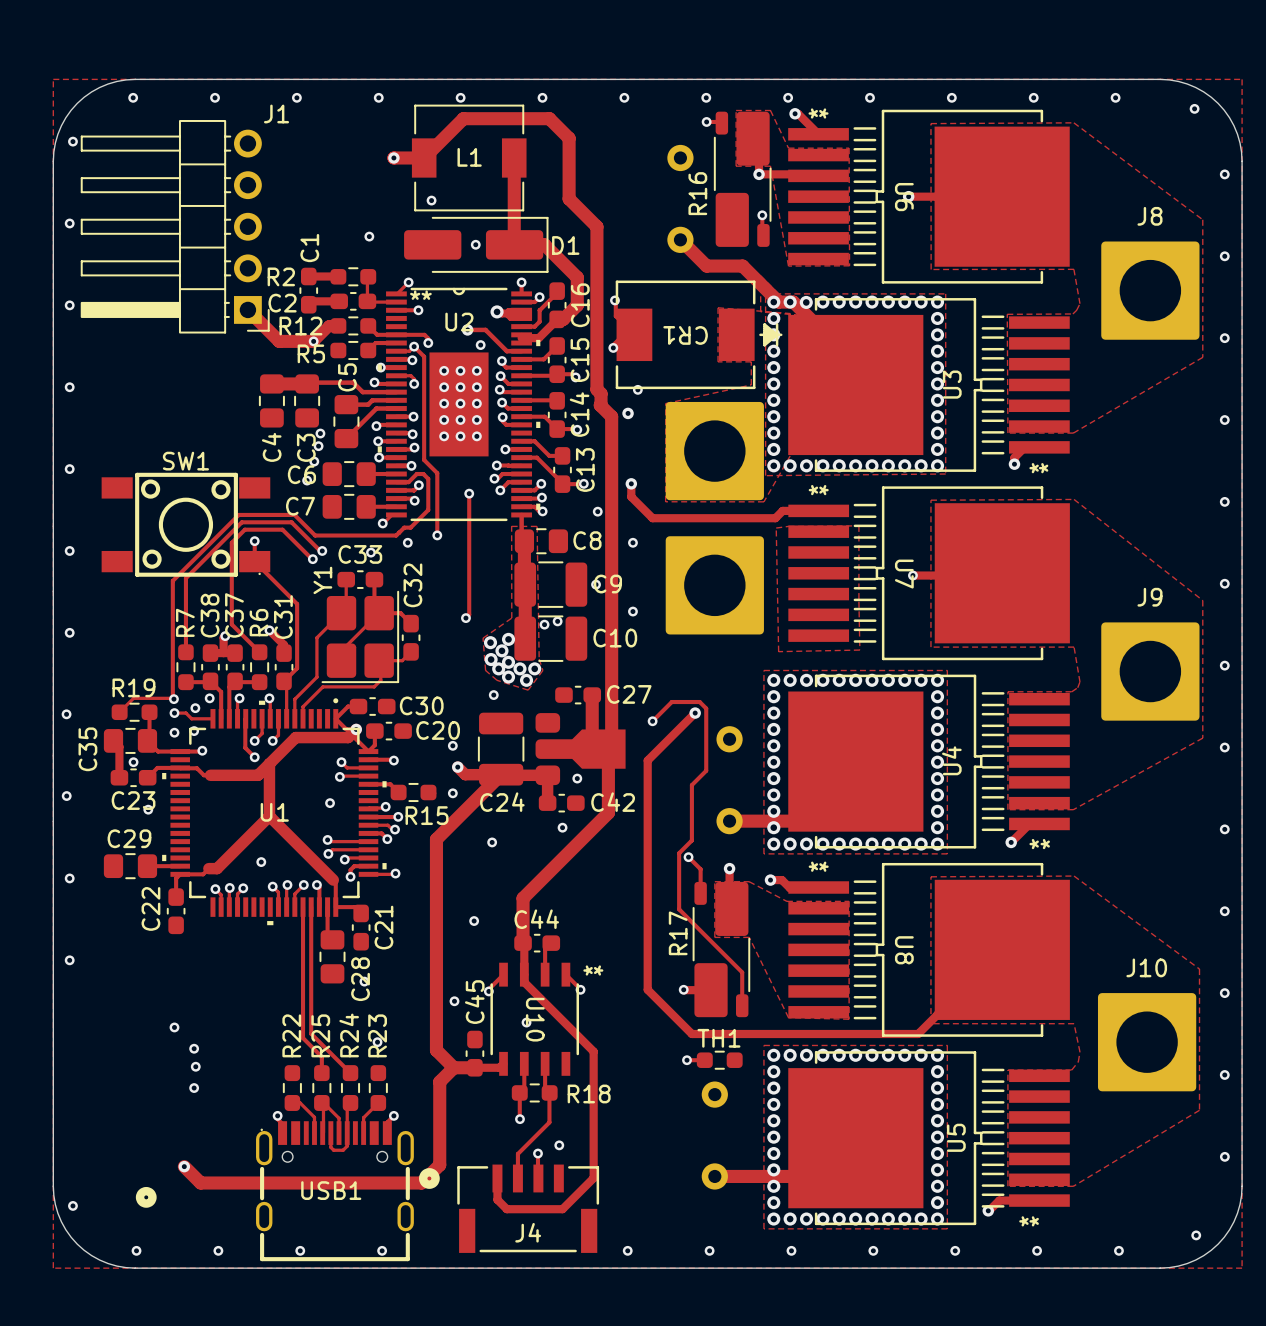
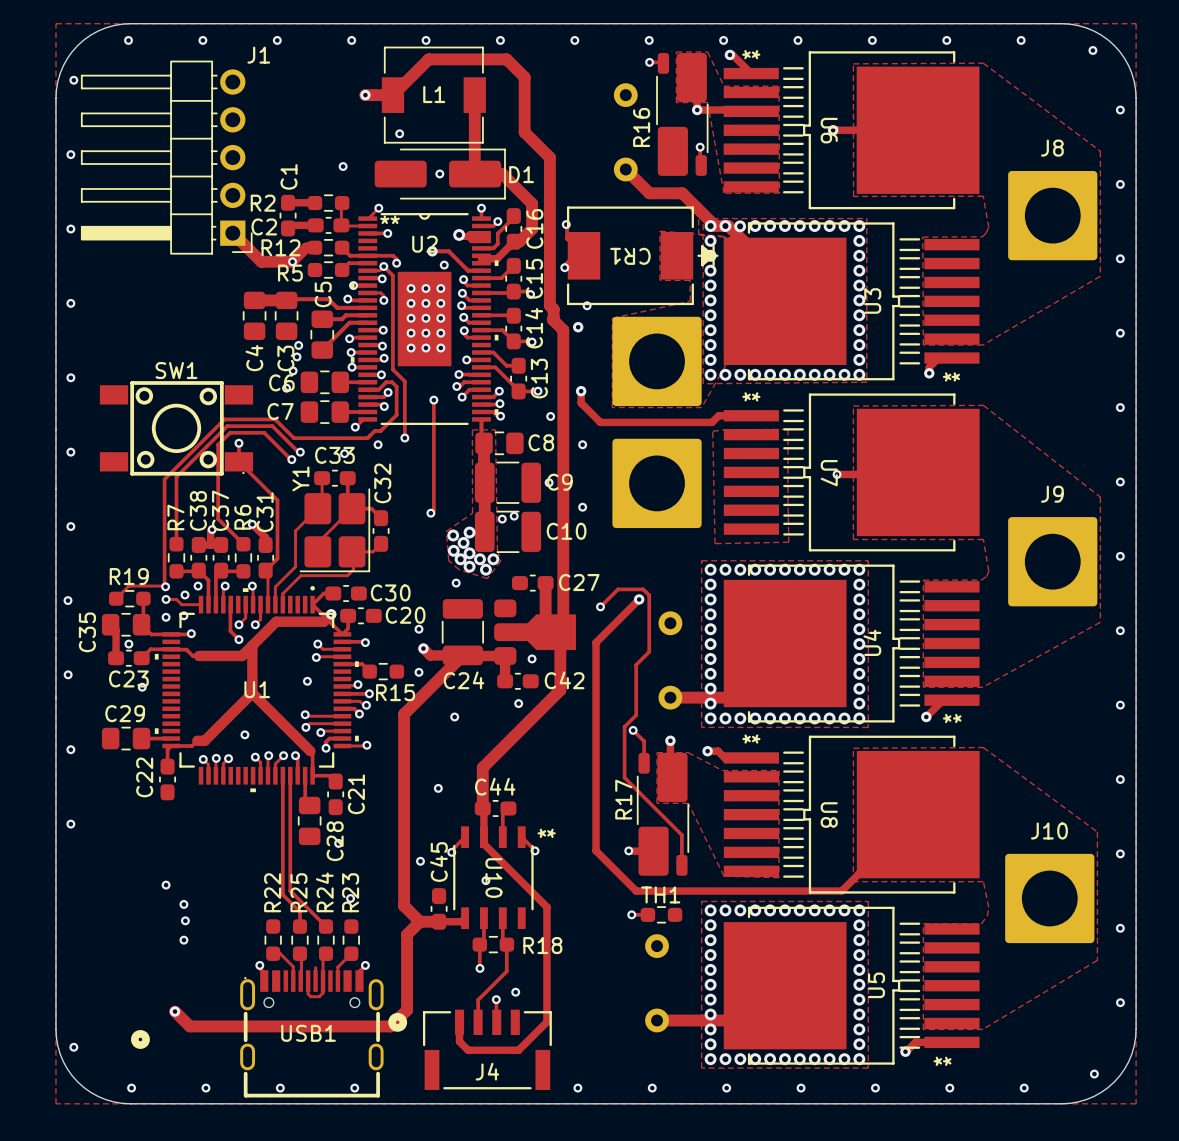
track: (321, 1102) (339, 1118) -> none

